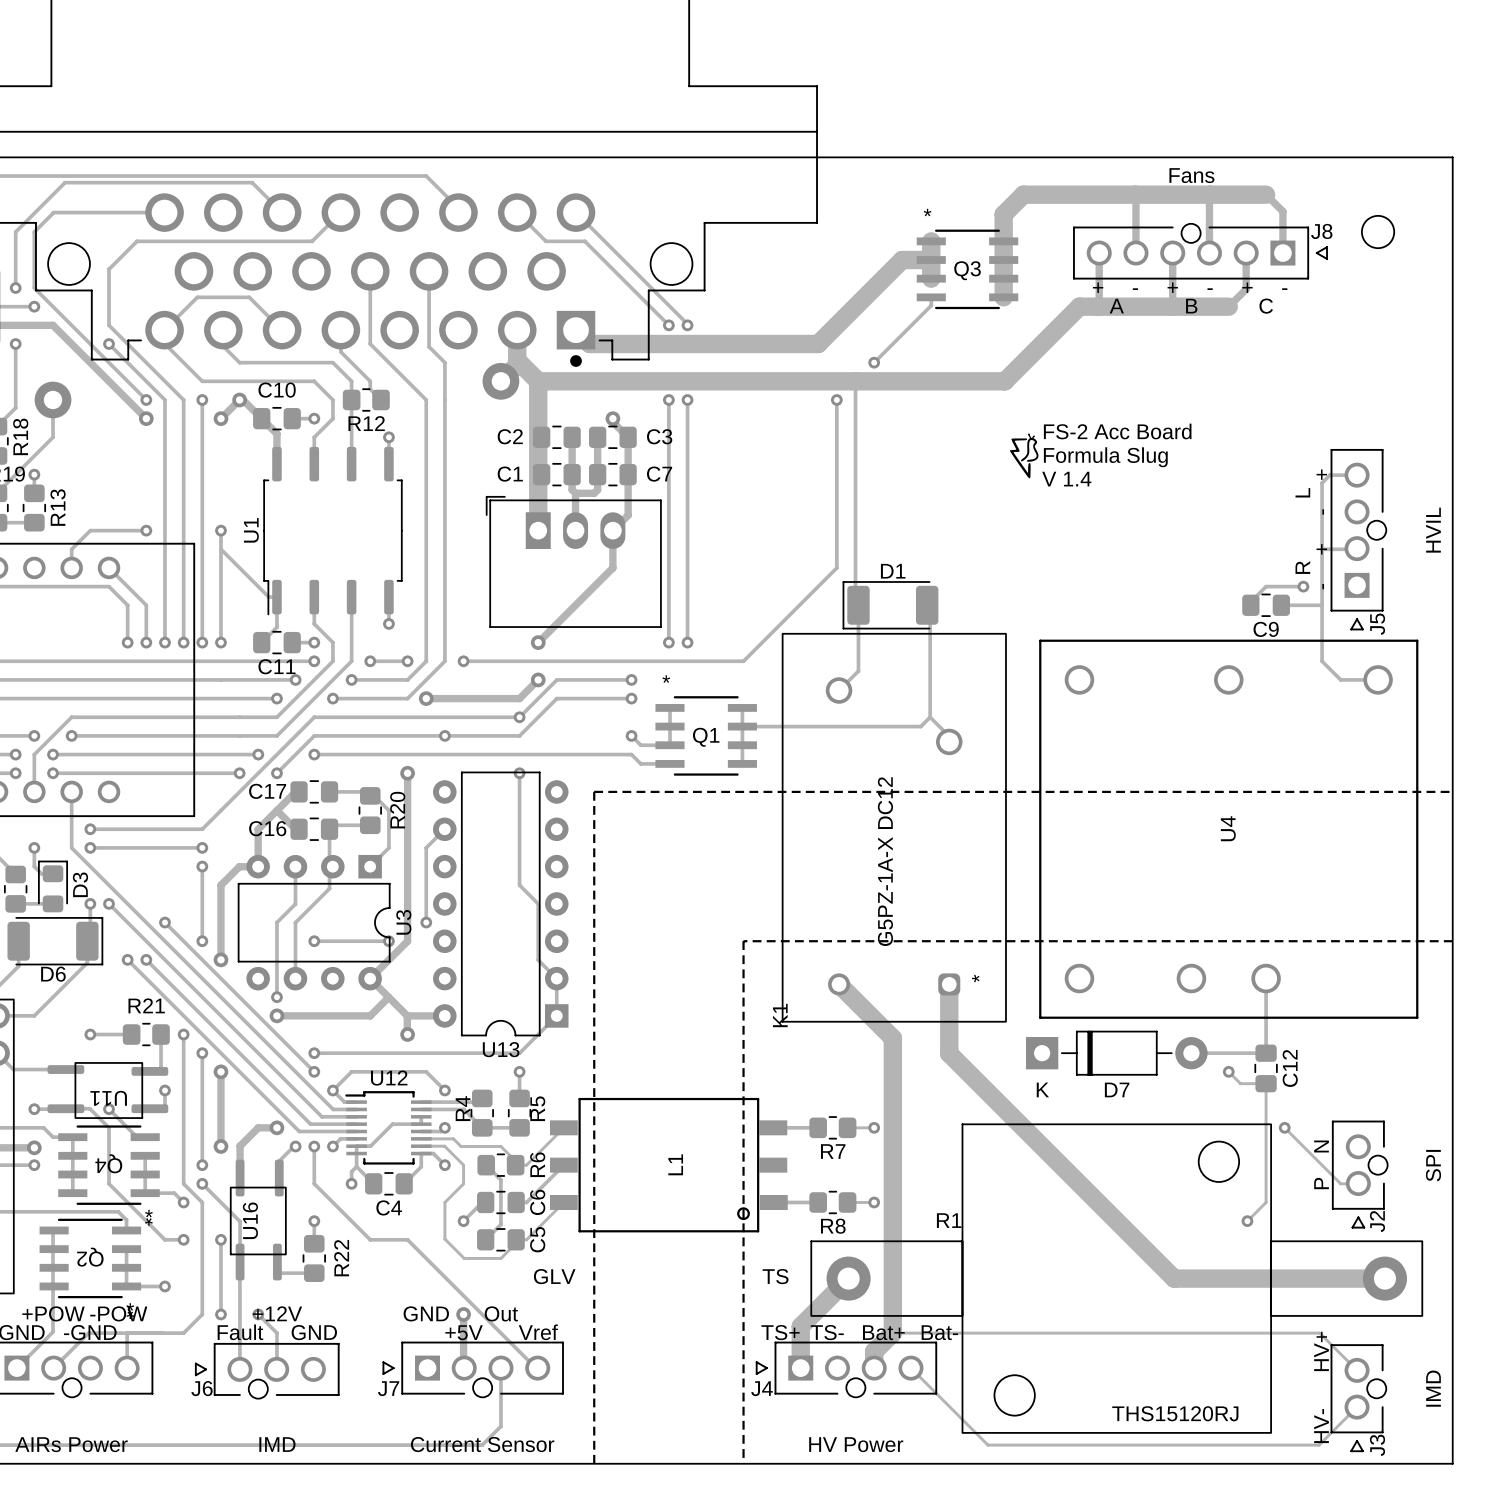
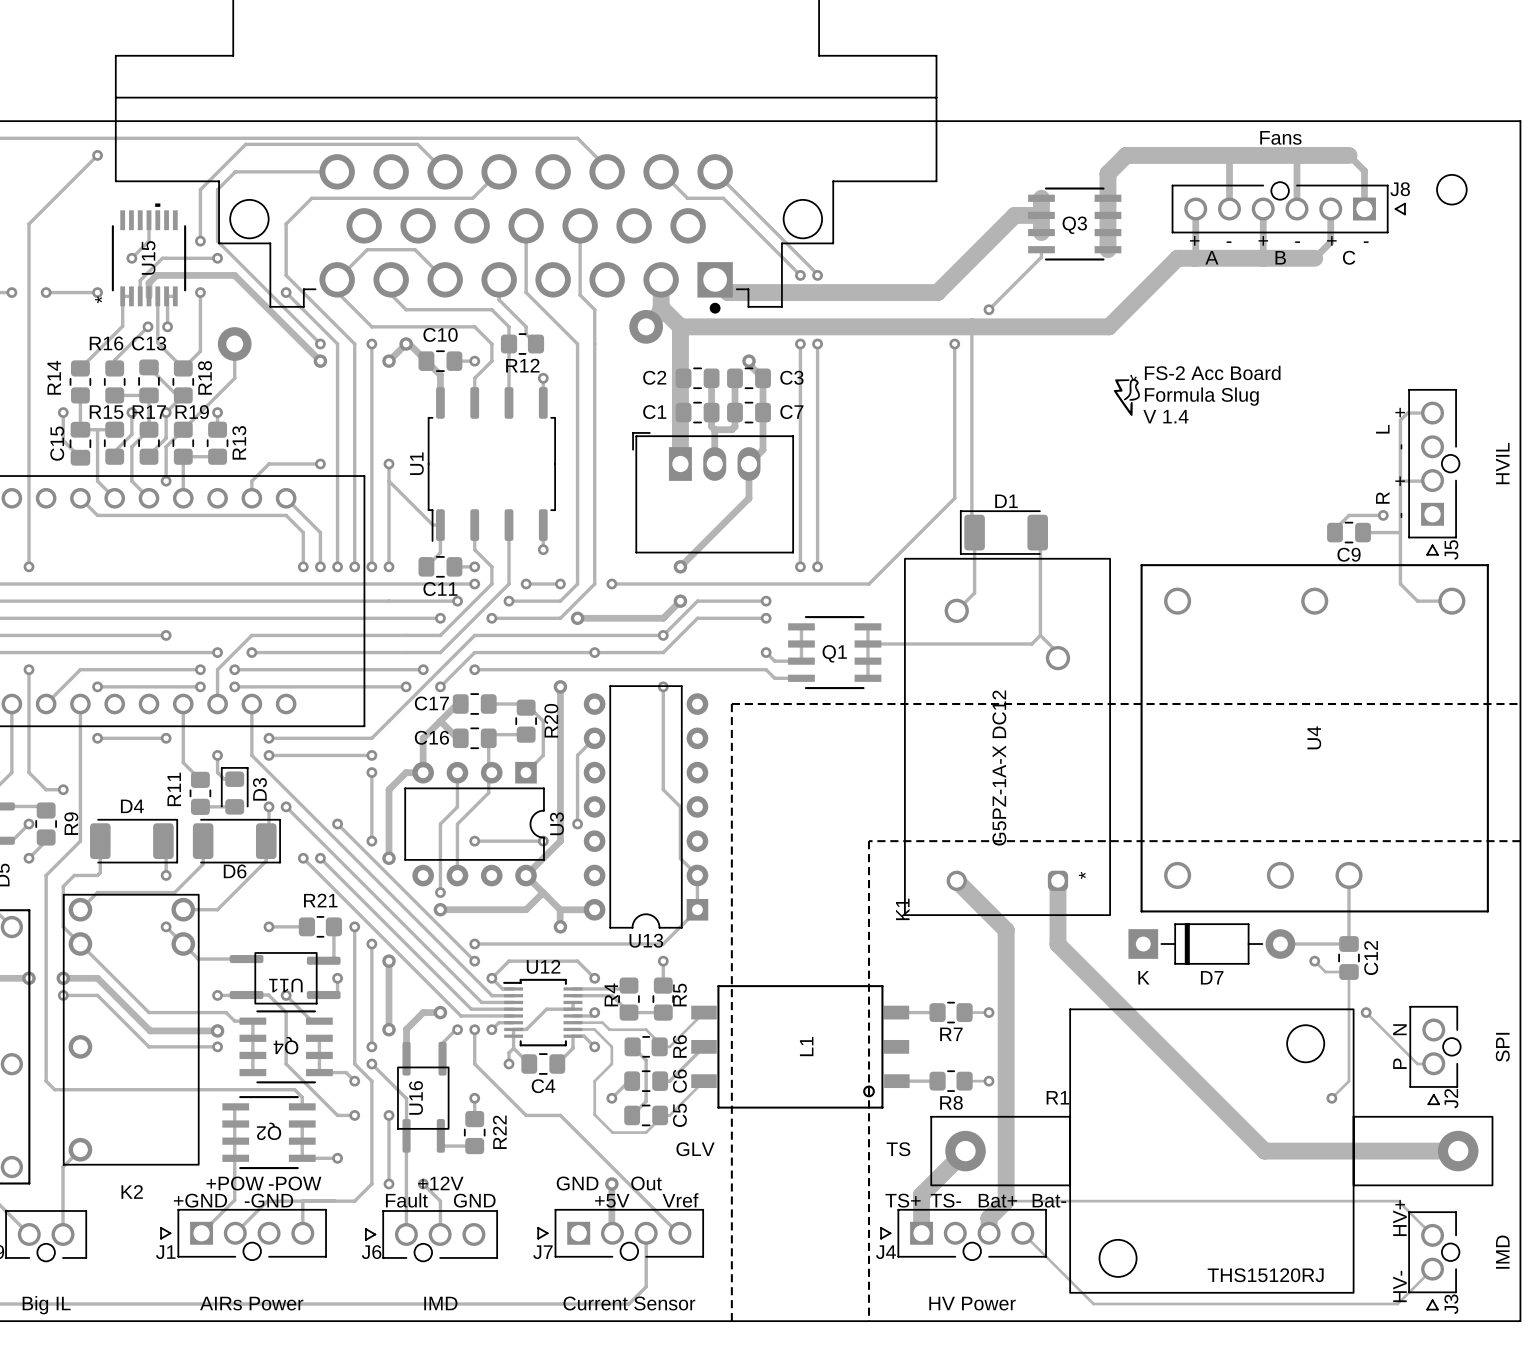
Q3 text: * (927, 212) -> none
Q1 text: * (666, 679) -> none
Q4 footprint: [58, 1125, 160, 1205] -> [239, 1010, 333, 1084]
Q2 footprint: [39, 1218, 142, 1299] -> [222, 1096, 316, 1170]

